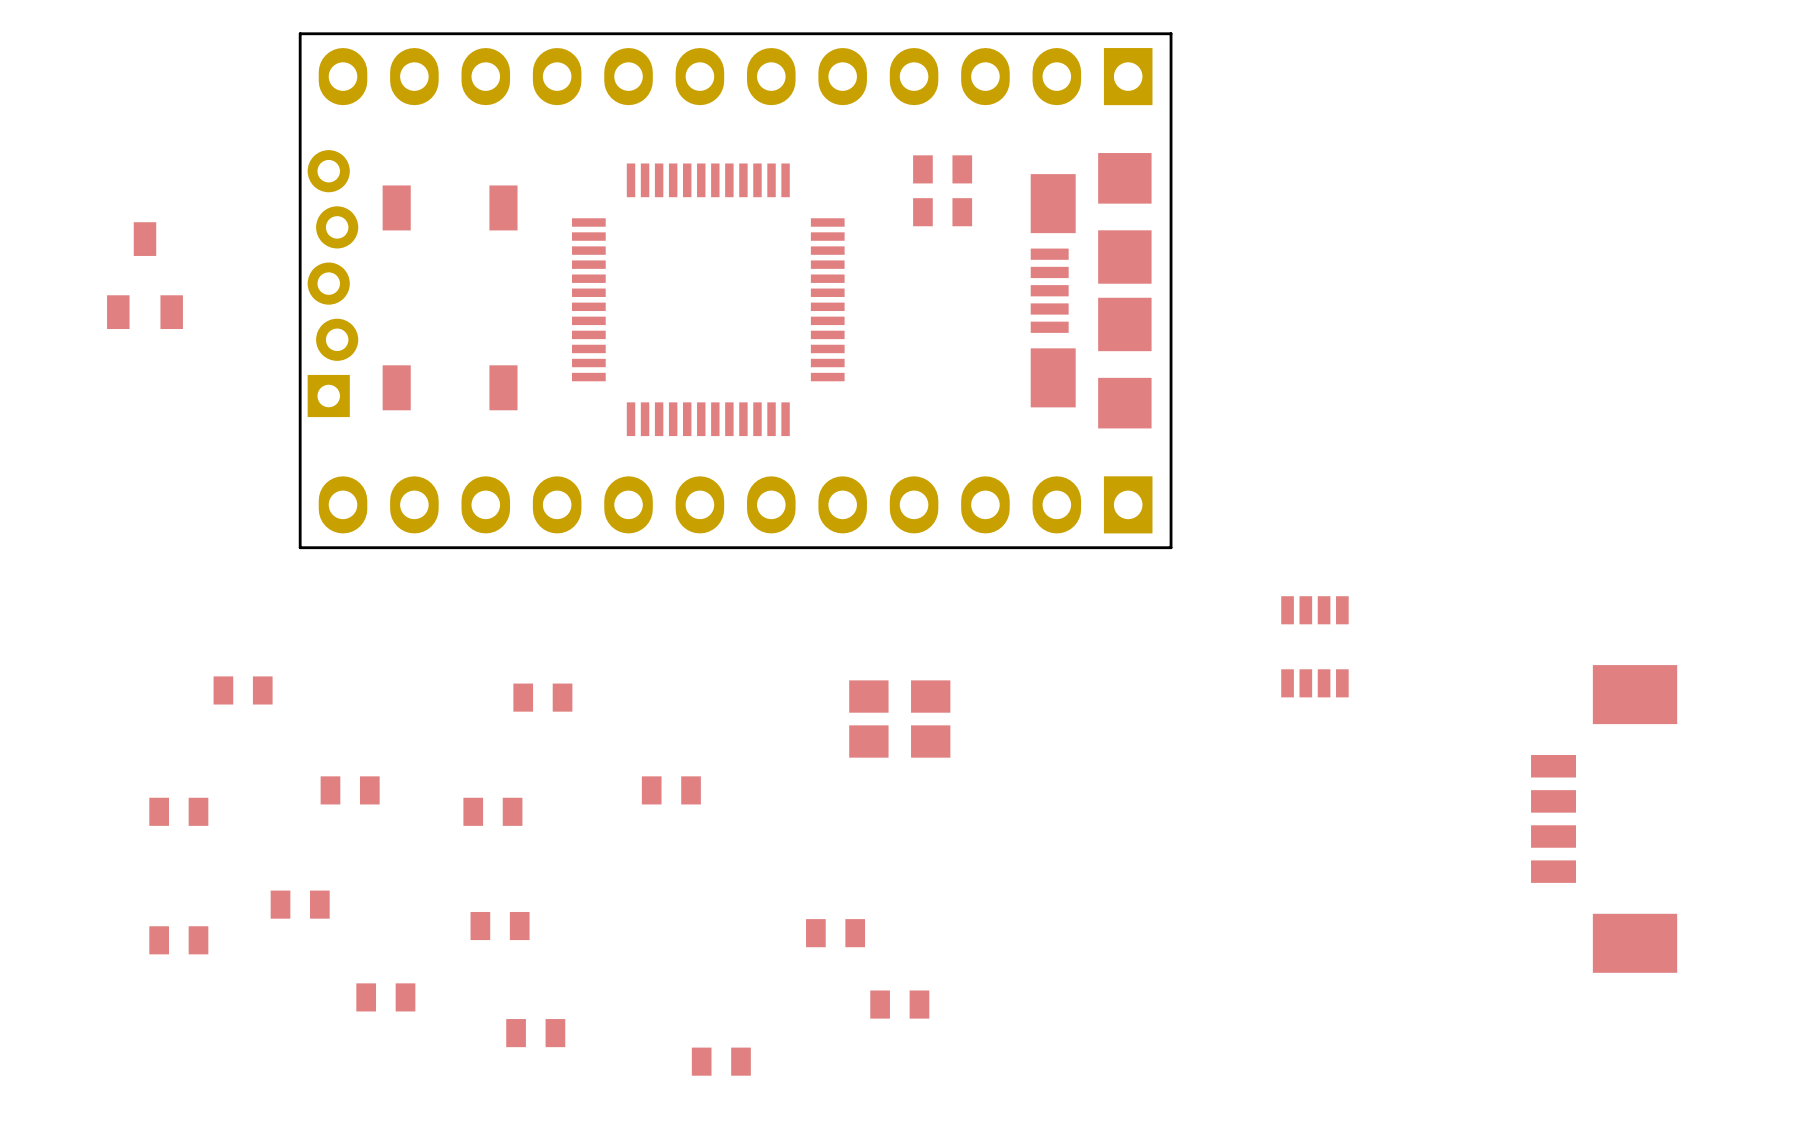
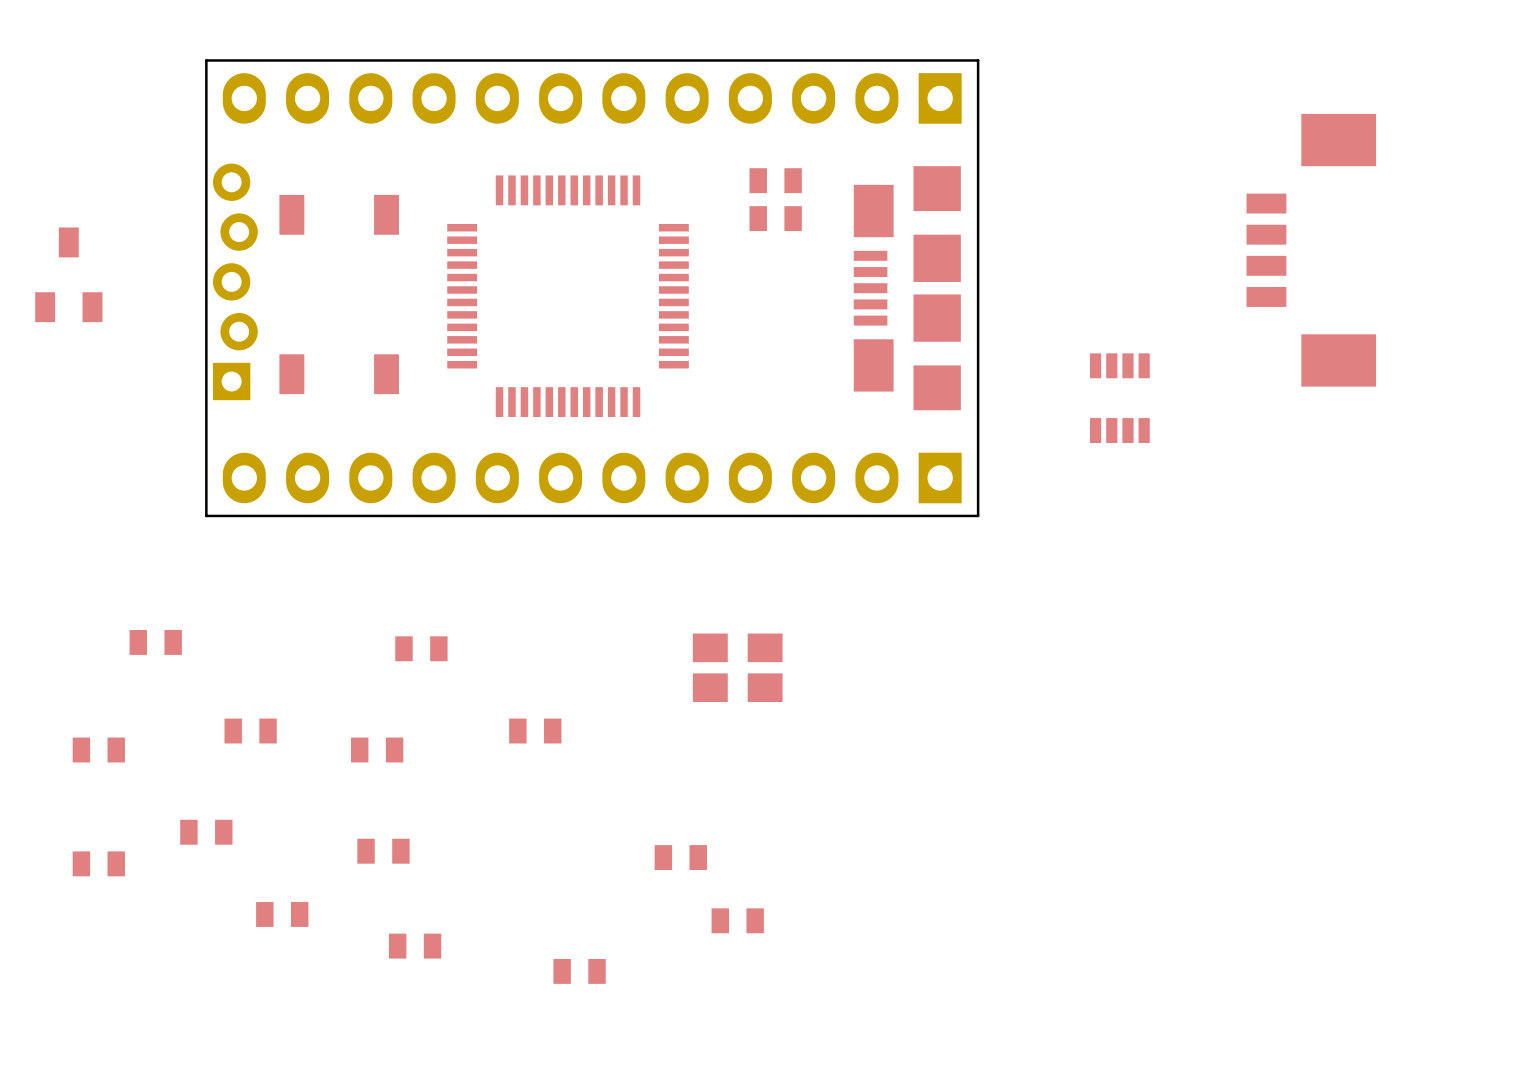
part position: (1314, 646) -> (1119, 398)
part position: (1604, 818) -> (1311, 250)

